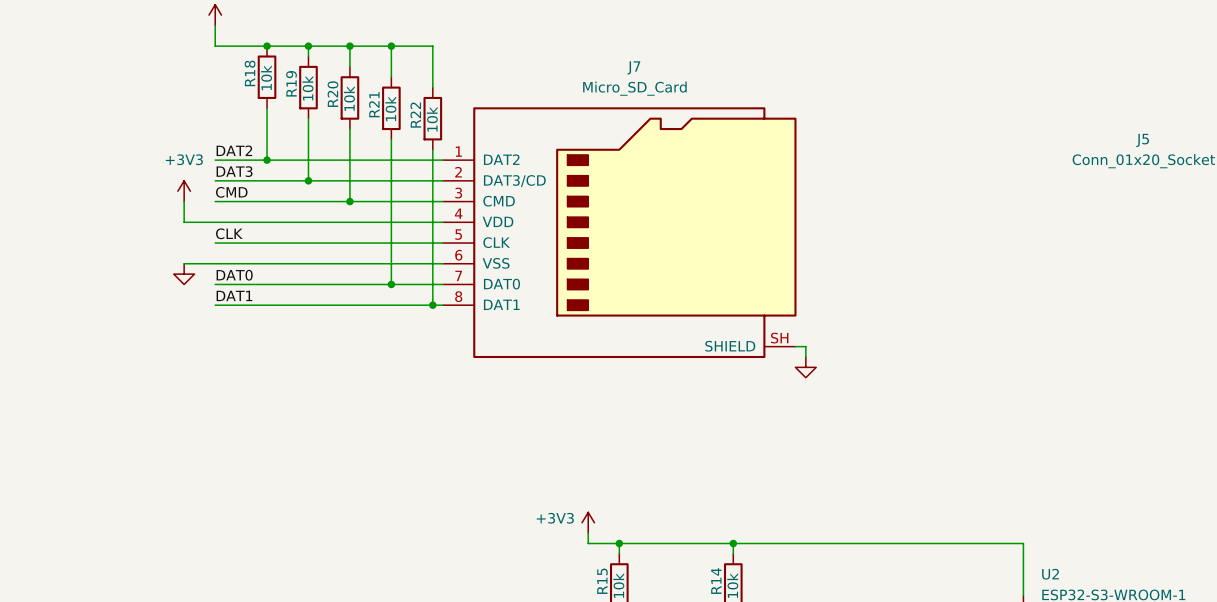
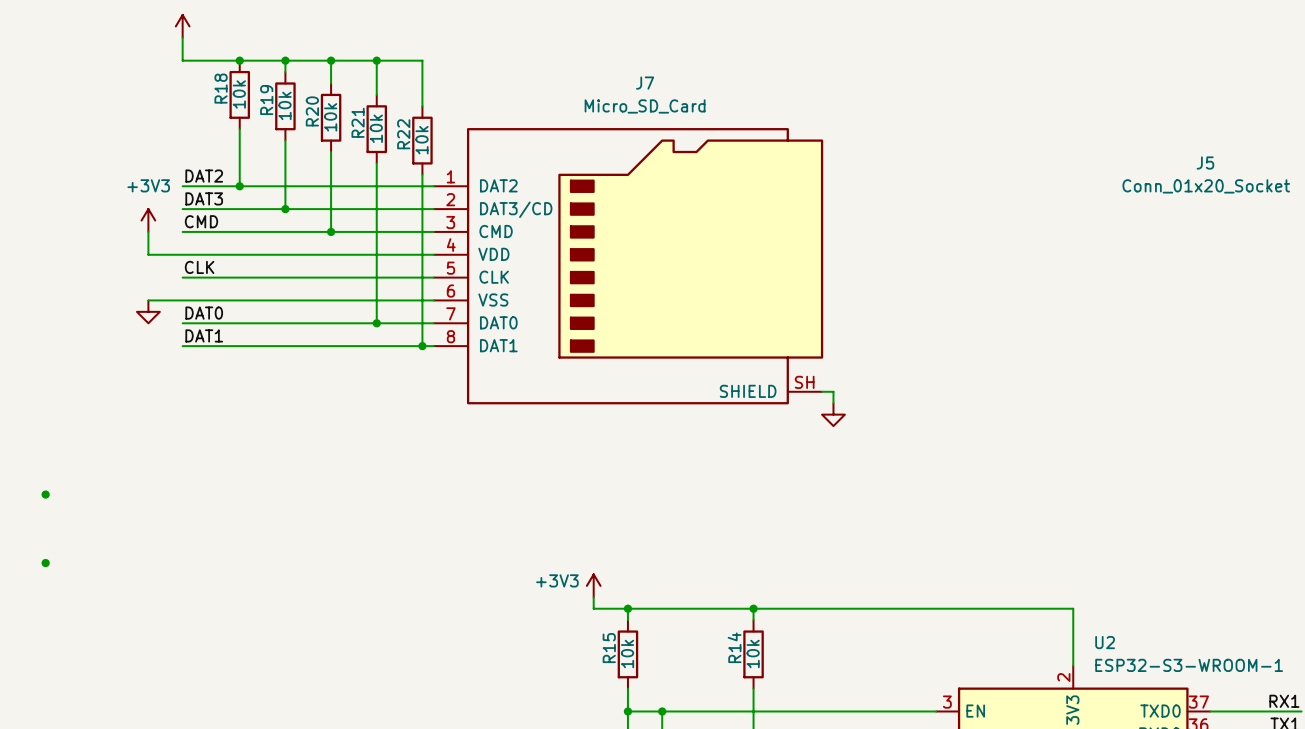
junction: none -> (45, 494)
junction: none -> (45, 563)

